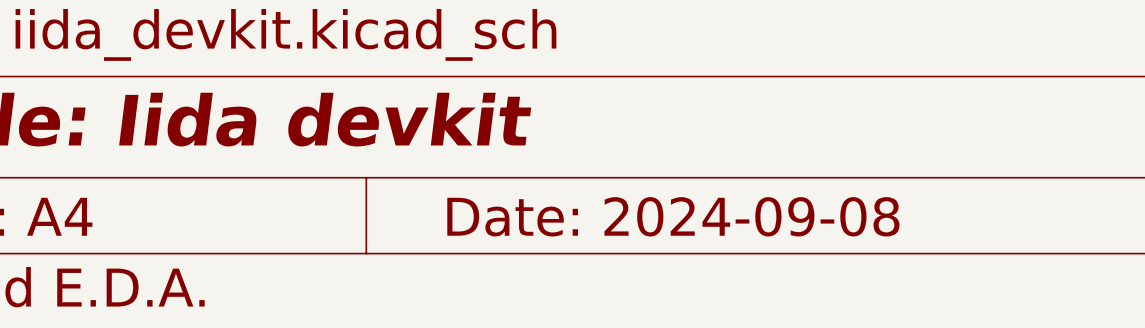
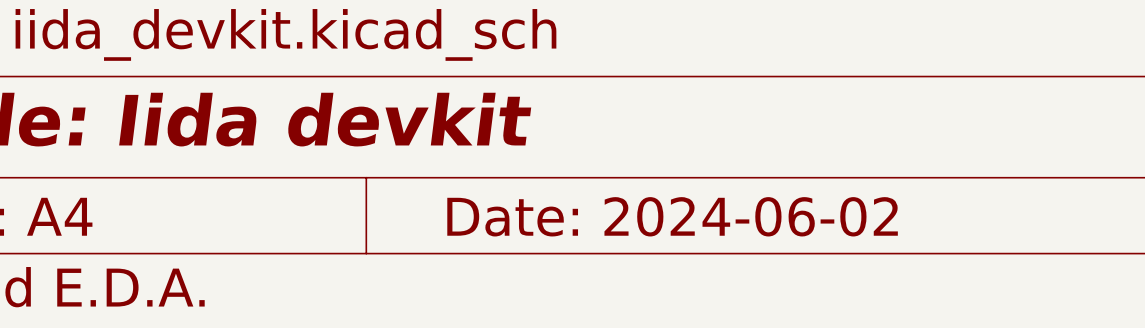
title block: Date: 2024-09-08 (673, 216) -> Date: 2024-06-02 (672, 216)

